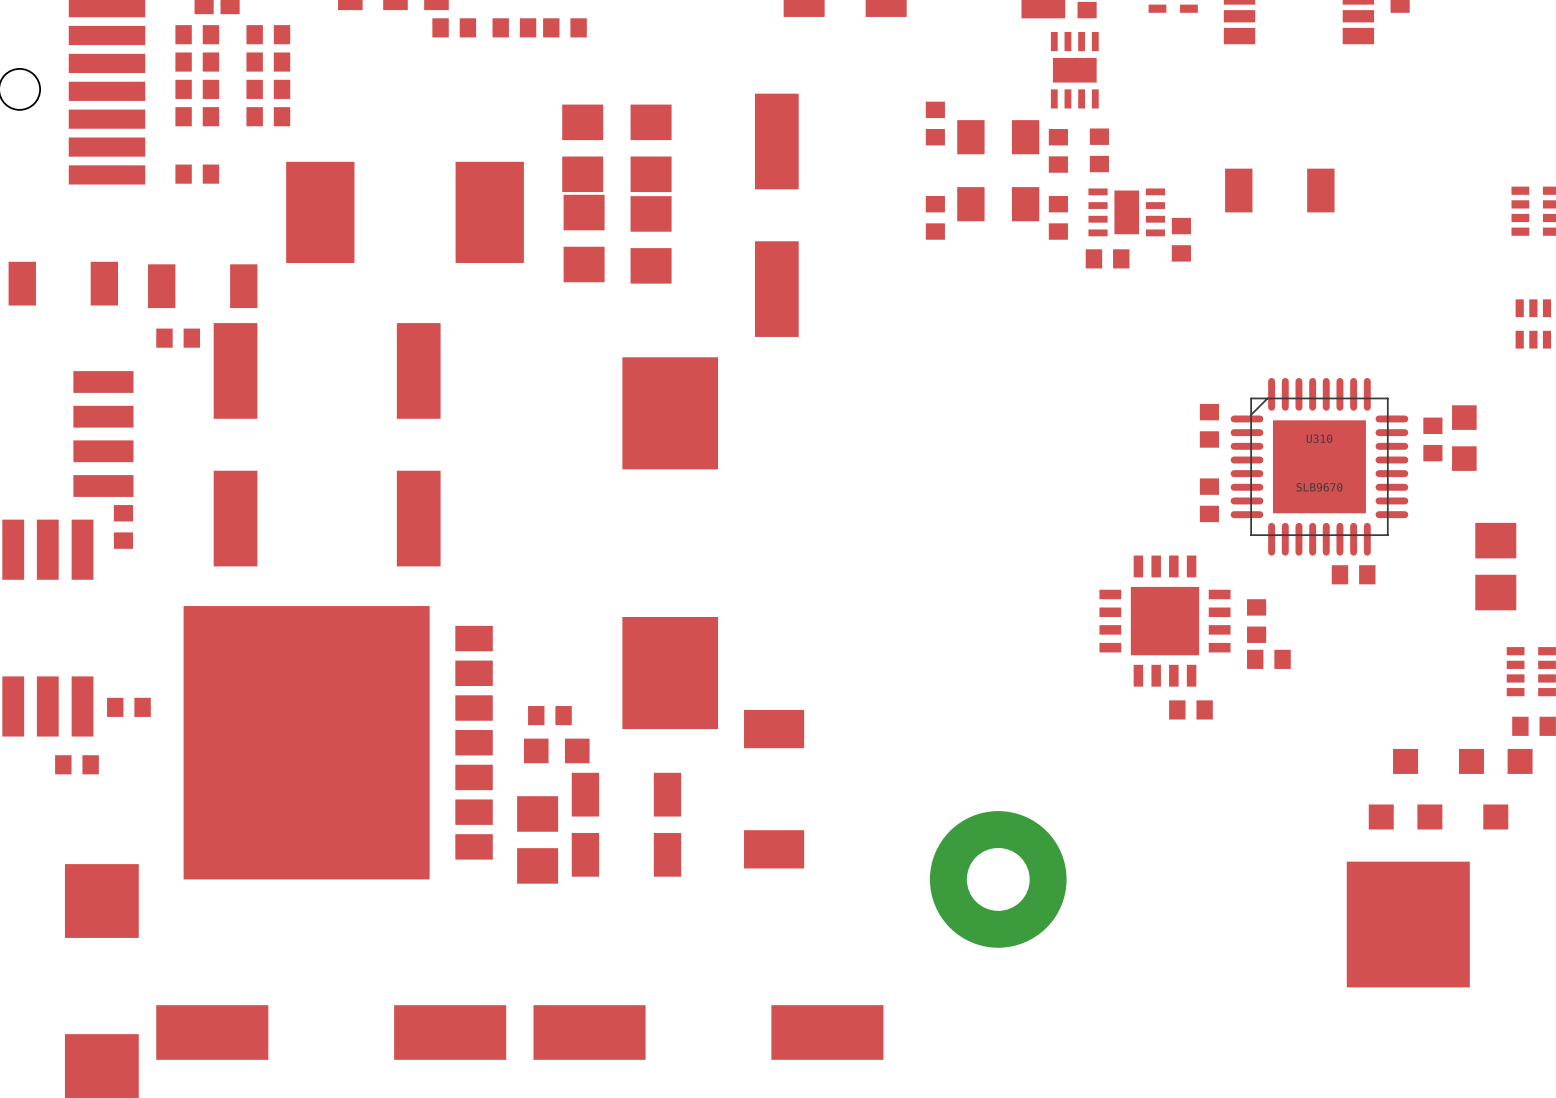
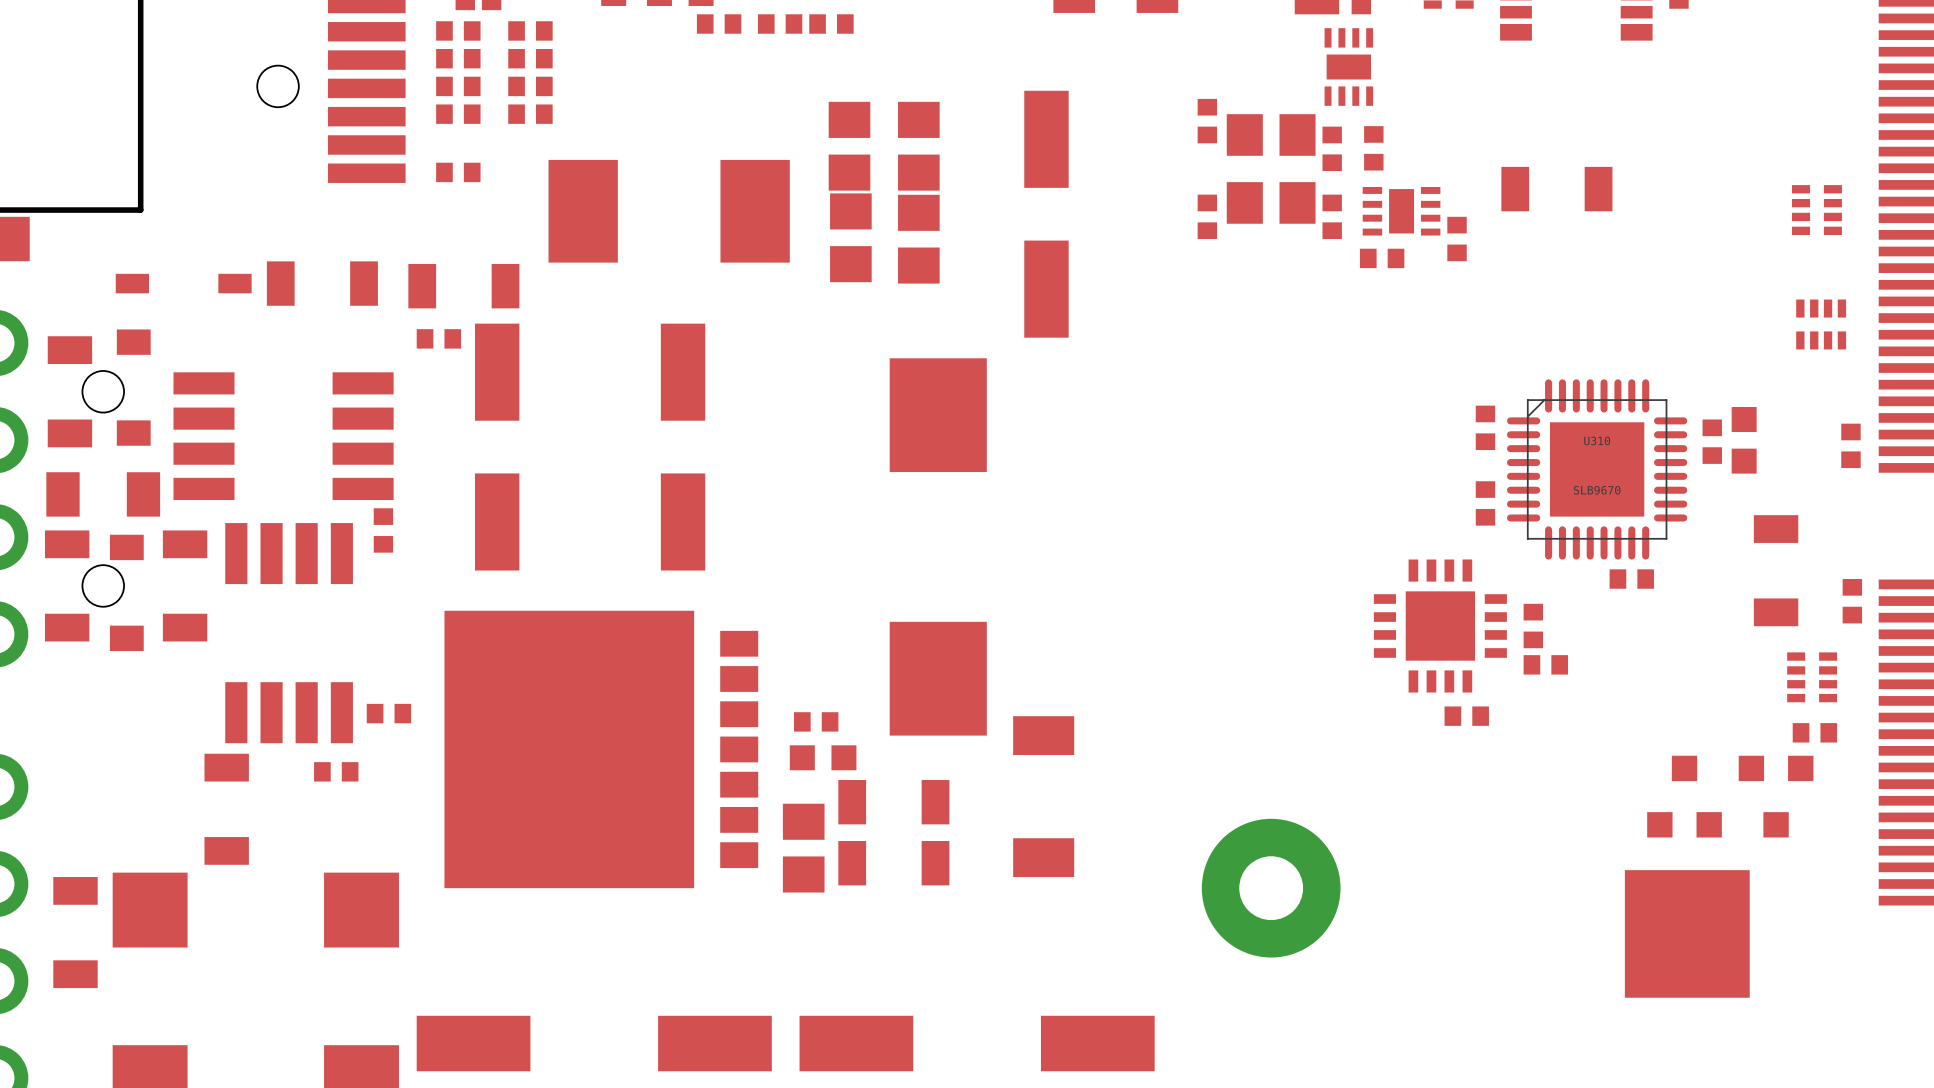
part footprint: [957, 120, 1040, 155] -> [1226, 114, 1316, 156]
part footprint: [957, 187, 1040, 222] -> [1226, 182, 1316, 224]
part footprint: [1475, 522, 1517, 611] -> [1753, 515, 1799, 627]

